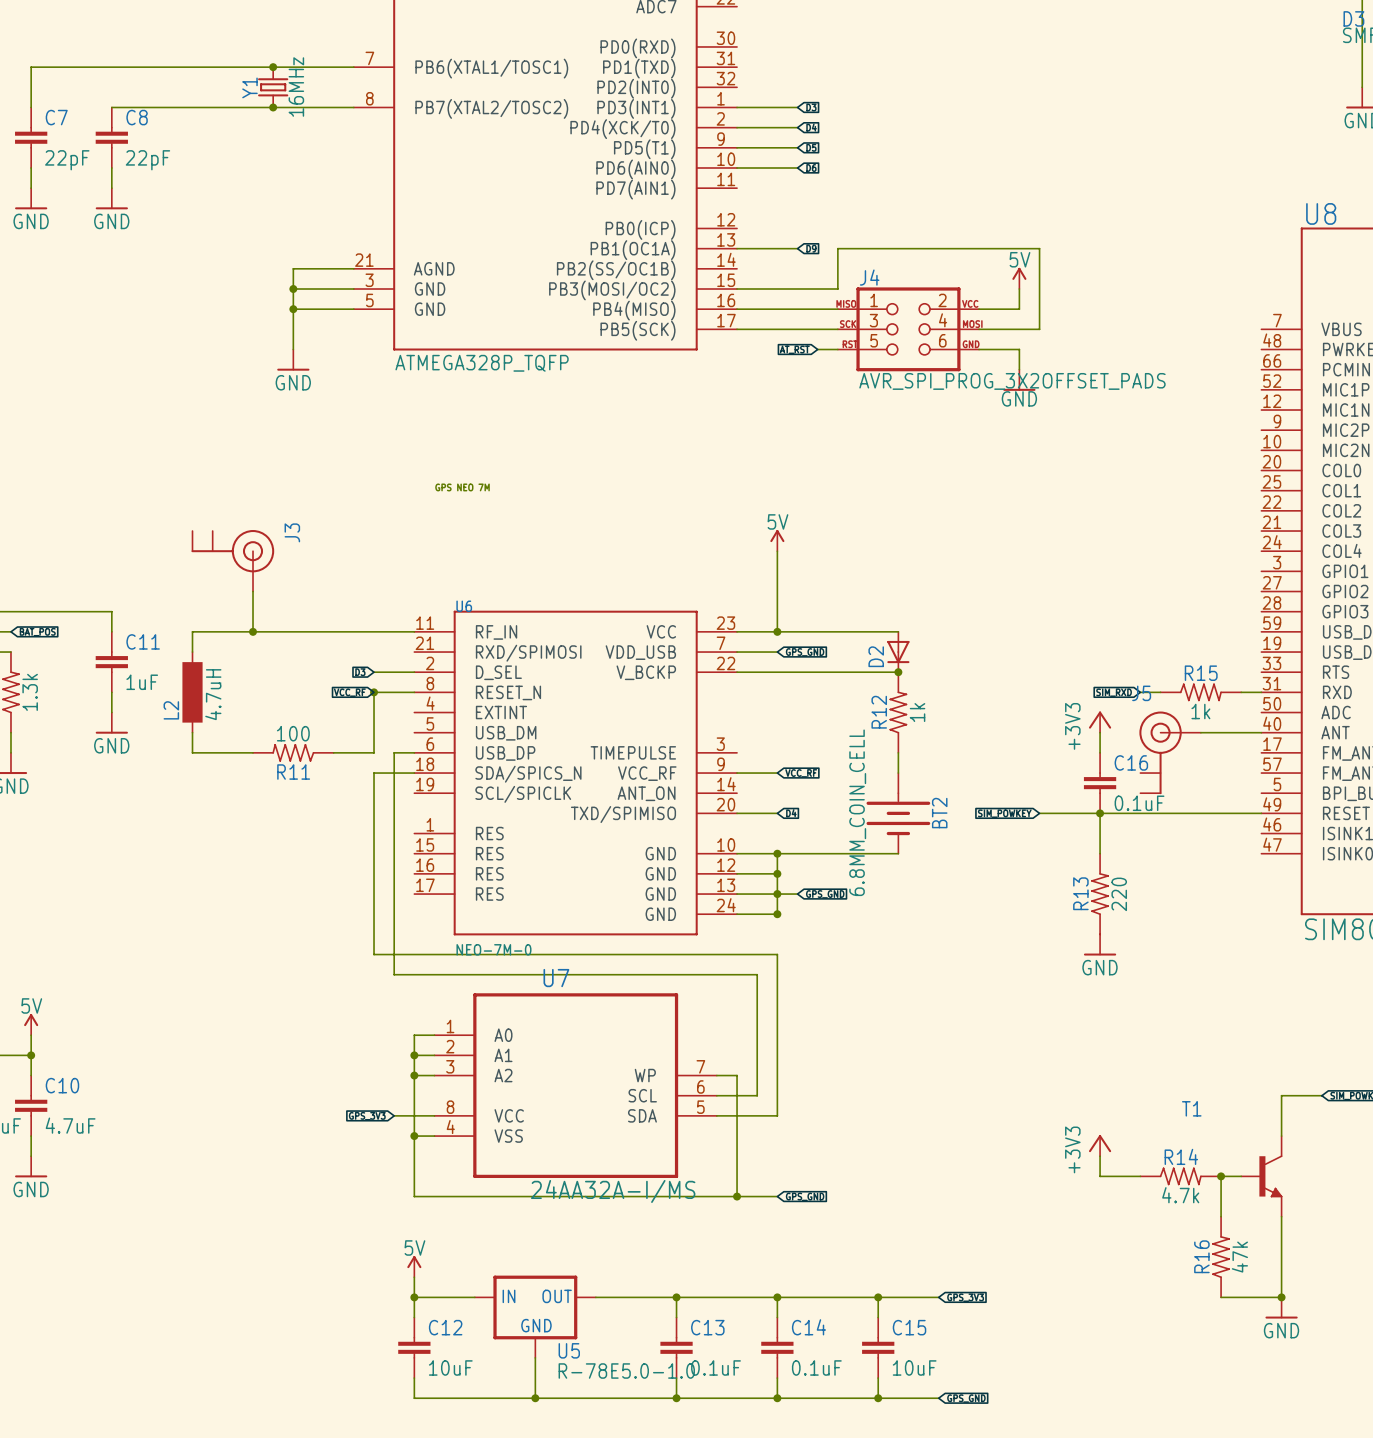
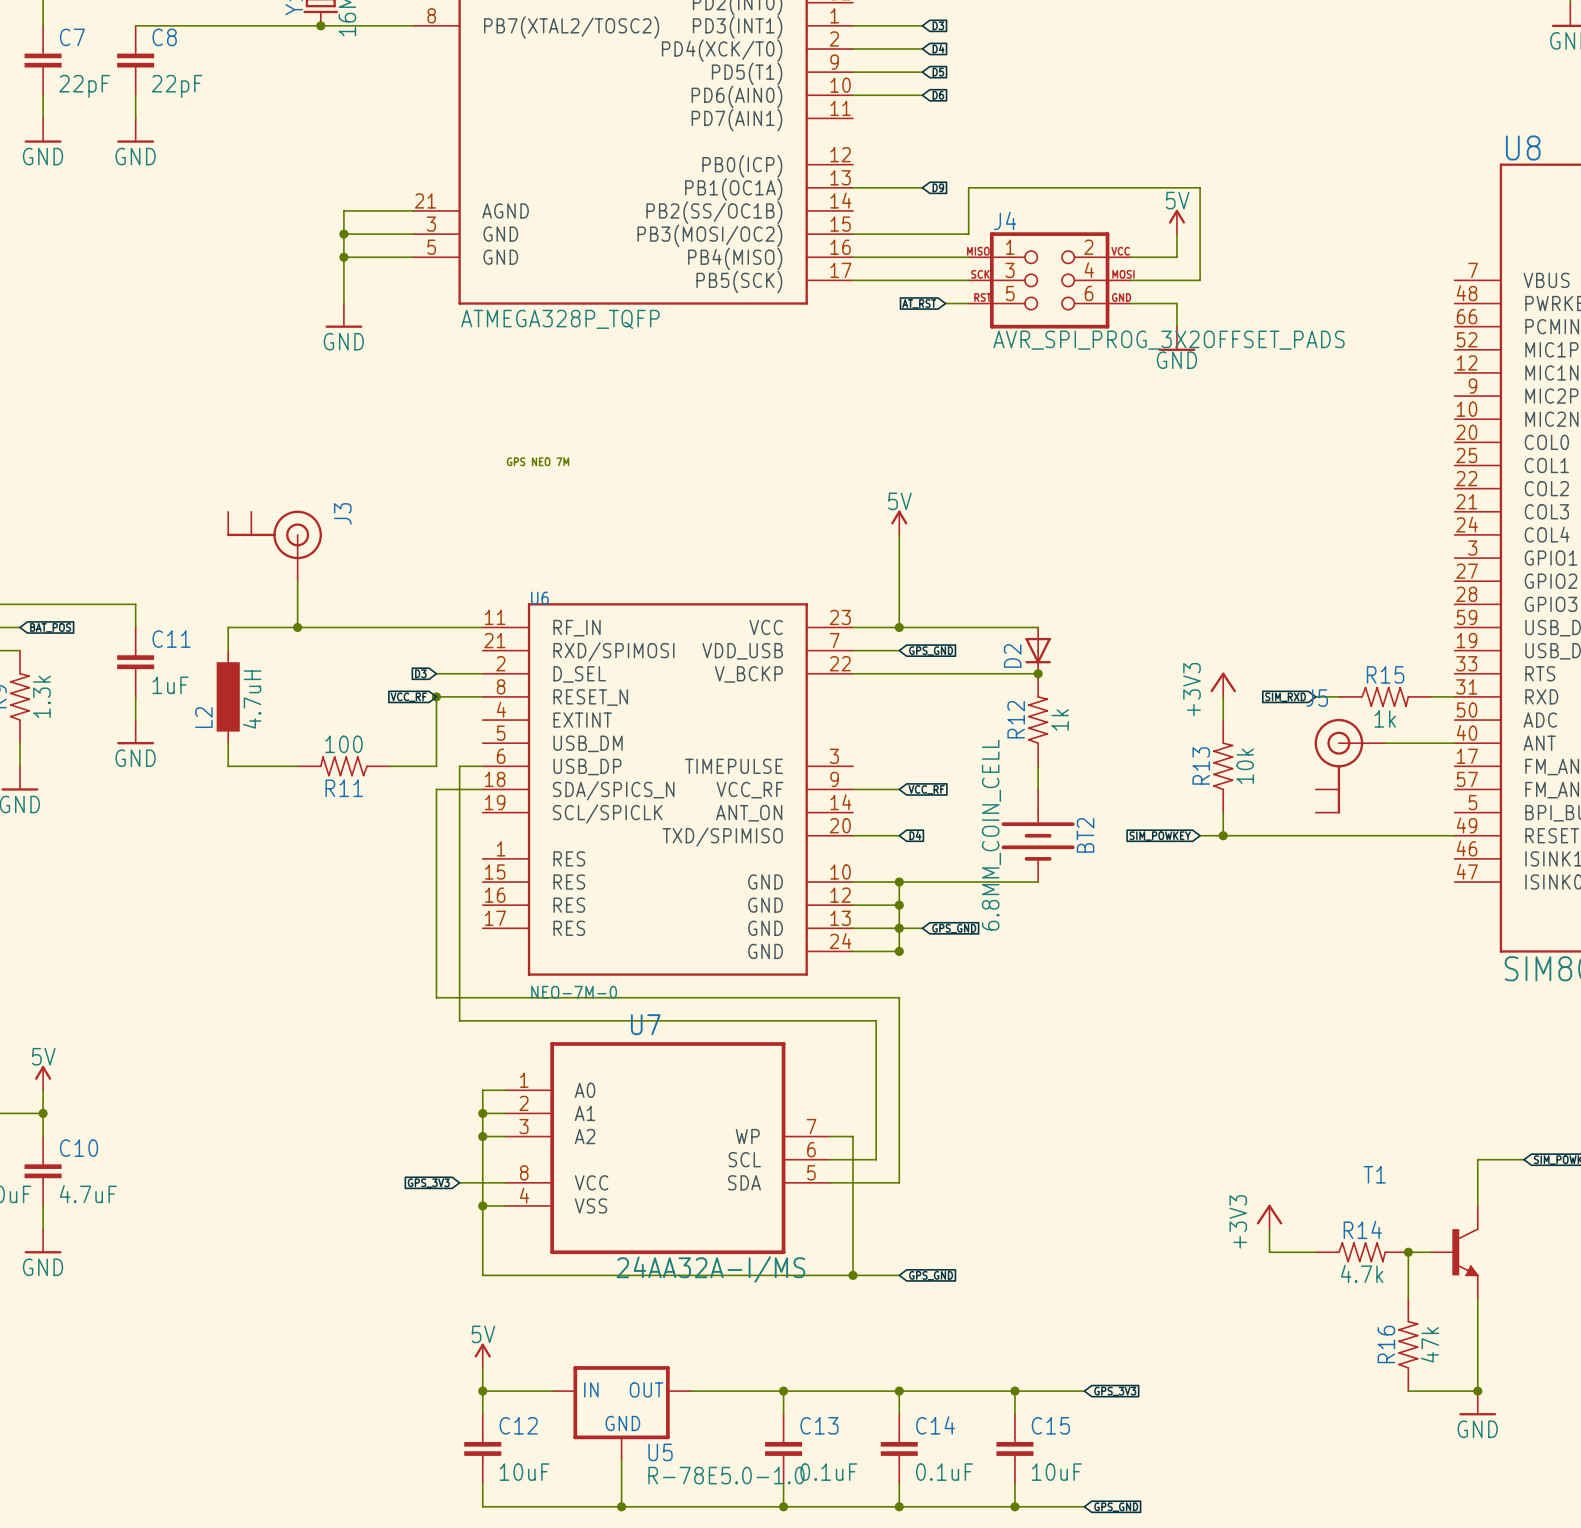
power symbol position: +3V3 (1100, 722) -> +3V3 (1223, 684)
wire: (1100, 732) (1100, 752) -> (1223, 696) (1223, 720)
C16: 0.1uF (1100, 783) -> none
wire: none -> (1223, 812) (1223, 835)
wire: (1100, 813) (1100, 853) -> none
junction position: (1100, 813) -> (1223, 835)
R13 position: (1100, 894) -> (1223, 766)
R13 value: 220 (1119, 894) -> 10k (1245, 766)
power symbol: GND (1100, 944) -> none

